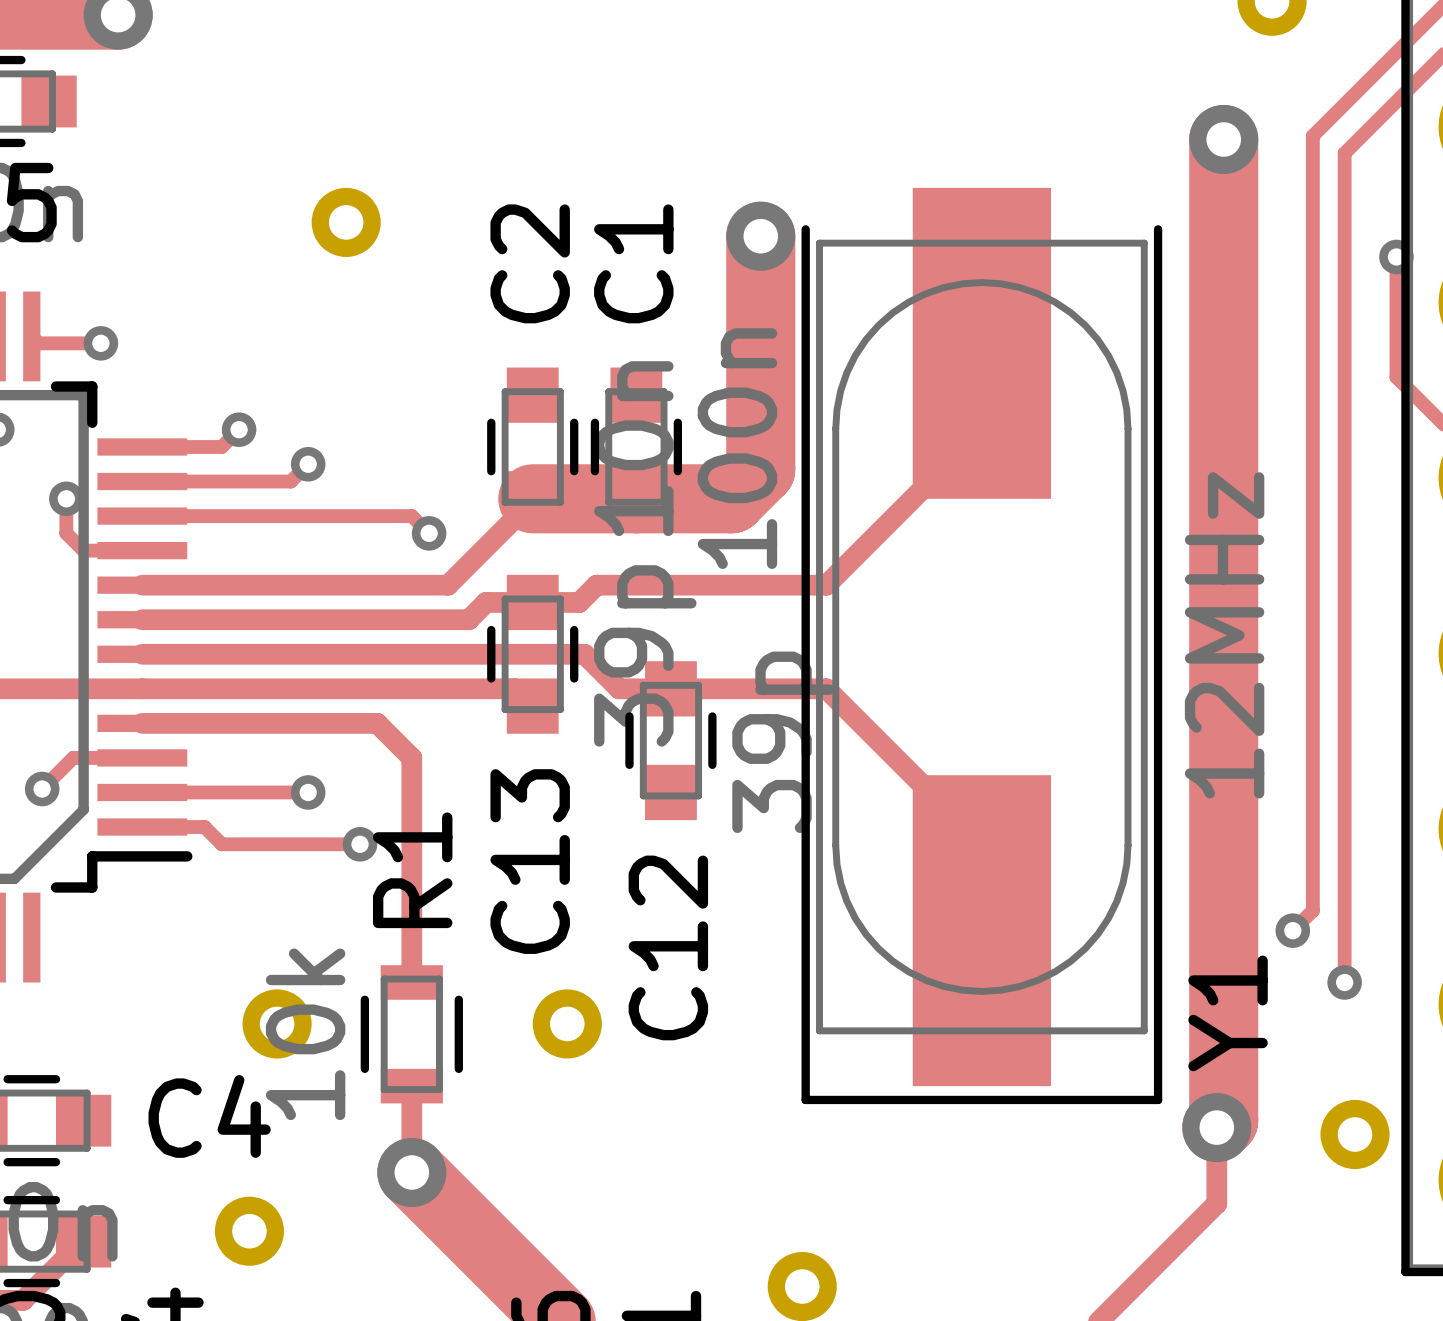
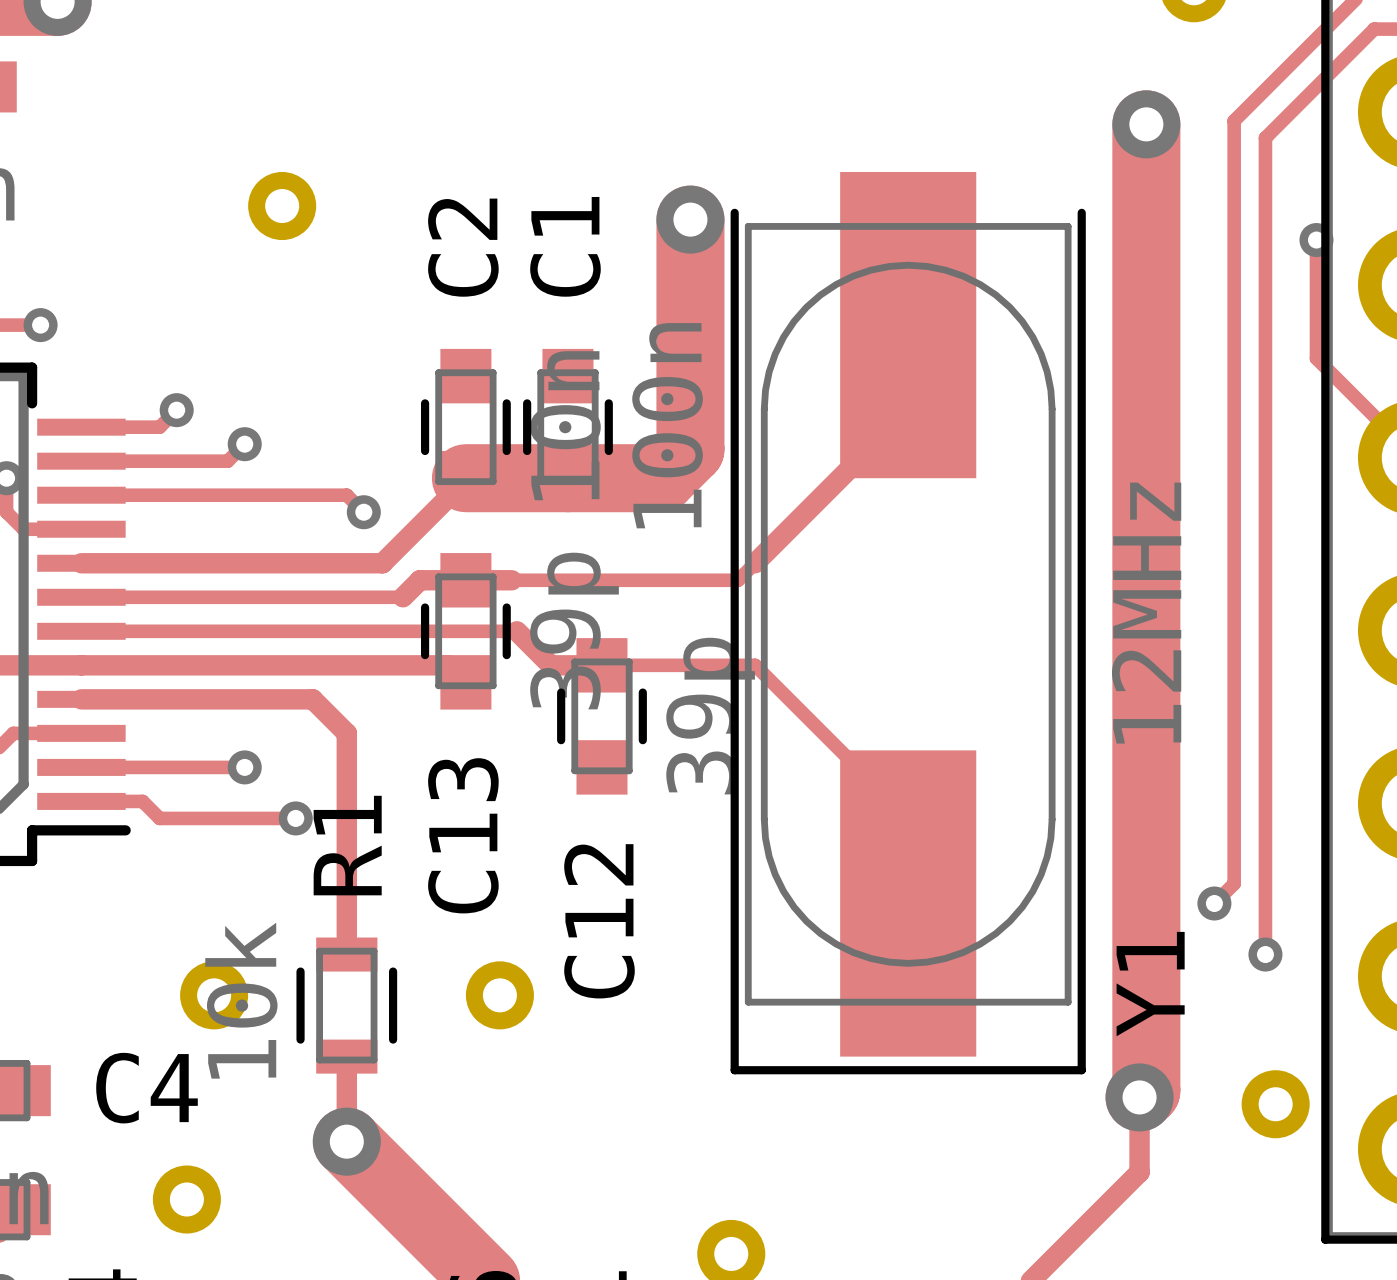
track: (826, 585) (596, 585) (579, 602) -> (755, 563) (738, 580) (511, 580)
track width: thick (142, 619) (468, 619) -> thin (81, 597) (402, 597)
track width: thick (142, 654) (584, 654) -> thin (81, 631) (516, 631)
track width: thick (688, 688) (826, 688) (981, 844) (981, 930) -> thin (619, 665) (755, 665) (908, 818) (908, 903)

